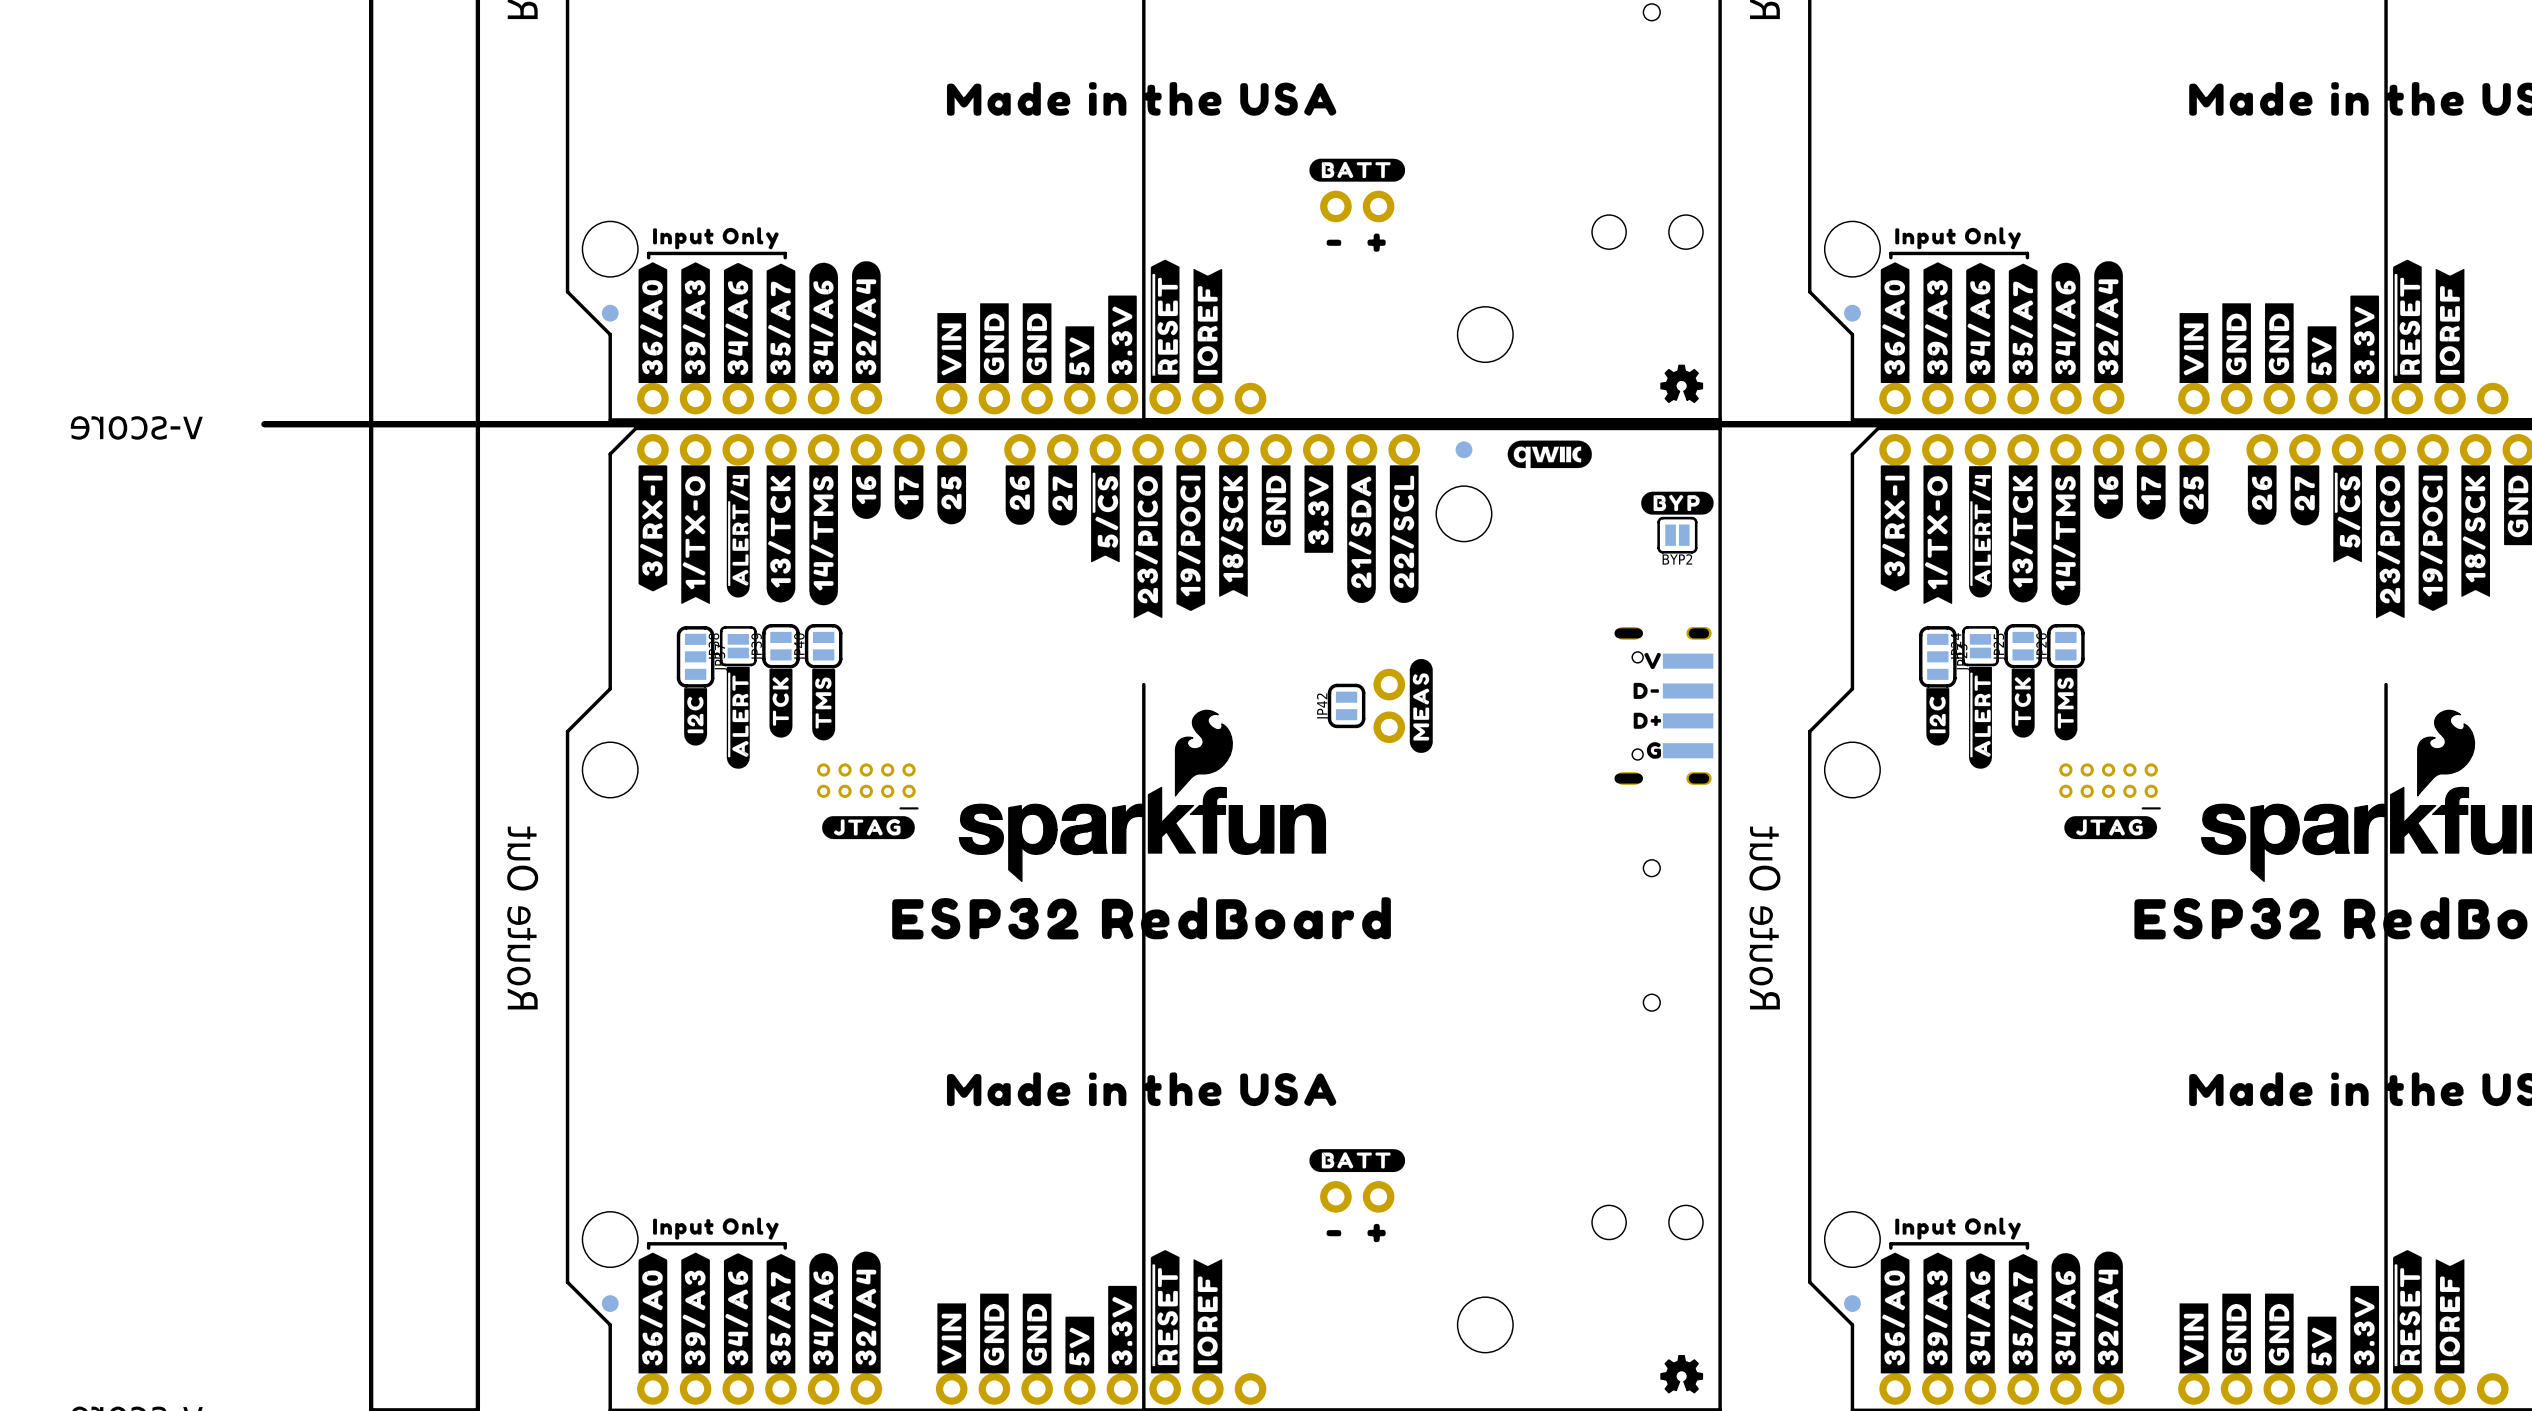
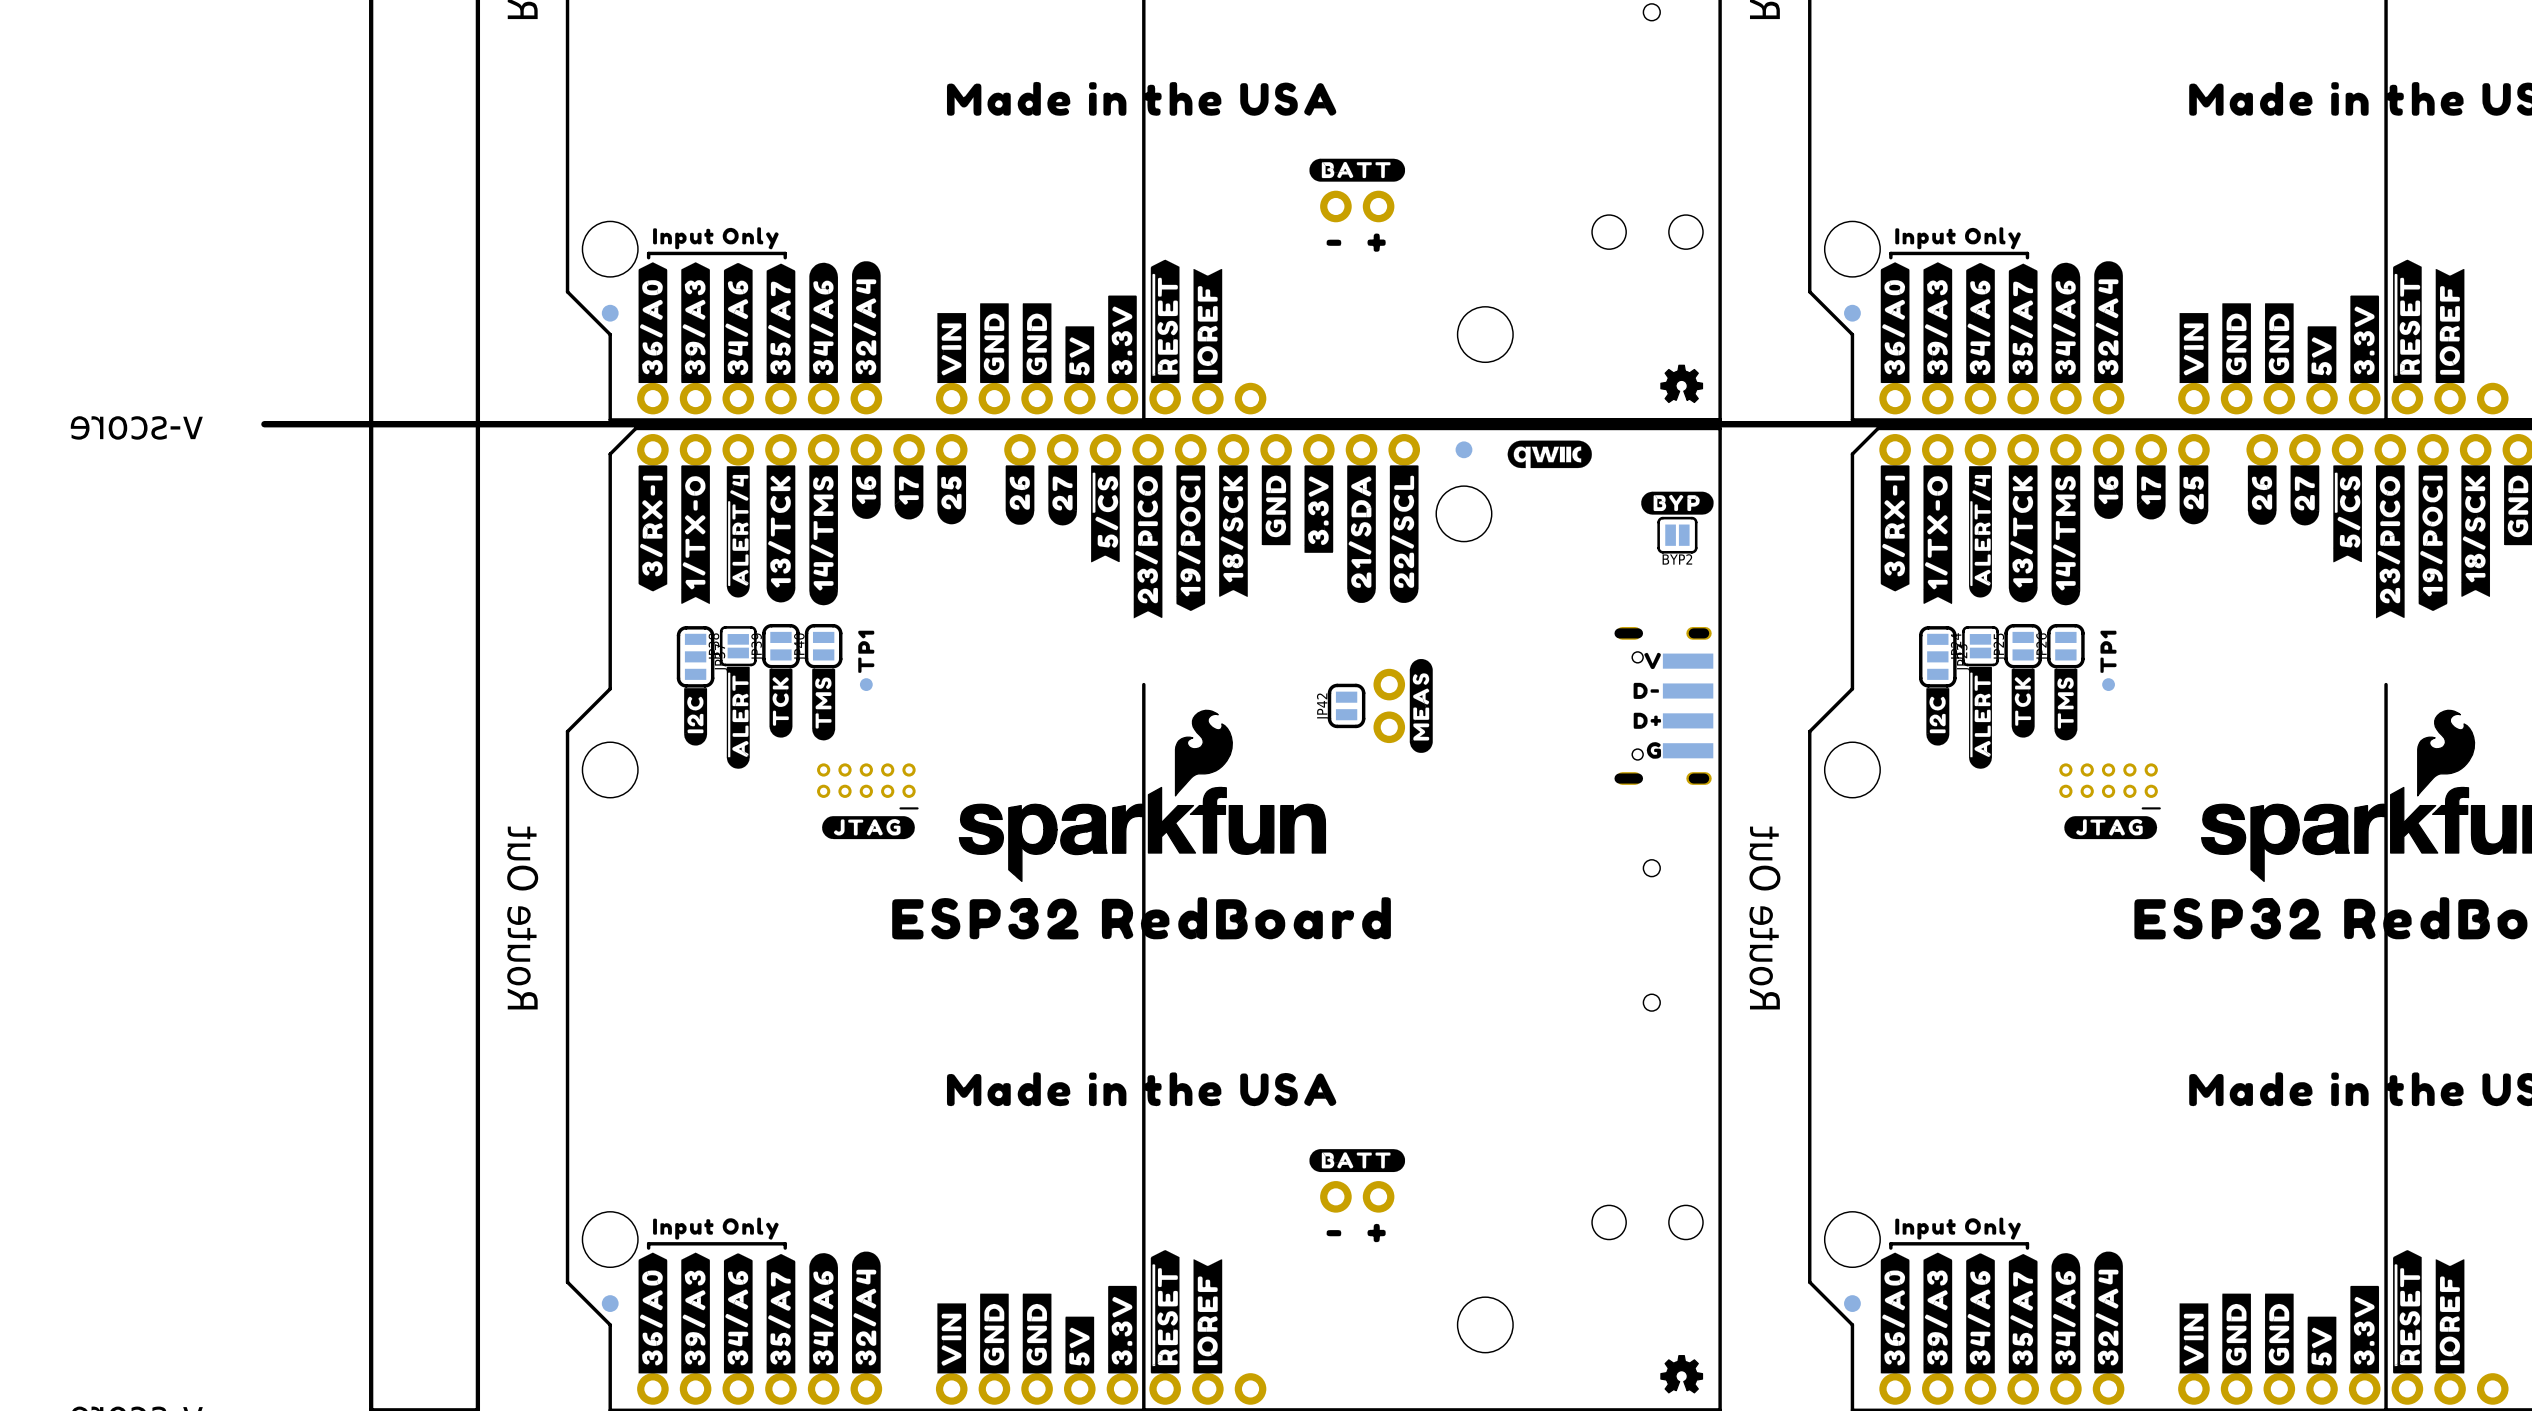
drawing: none -> [858, 630, 875, 673]
drawing: none -> [2100, 630, 2117, 673]
part: none -> (866, 684)
part: none -> (2108, 684)

